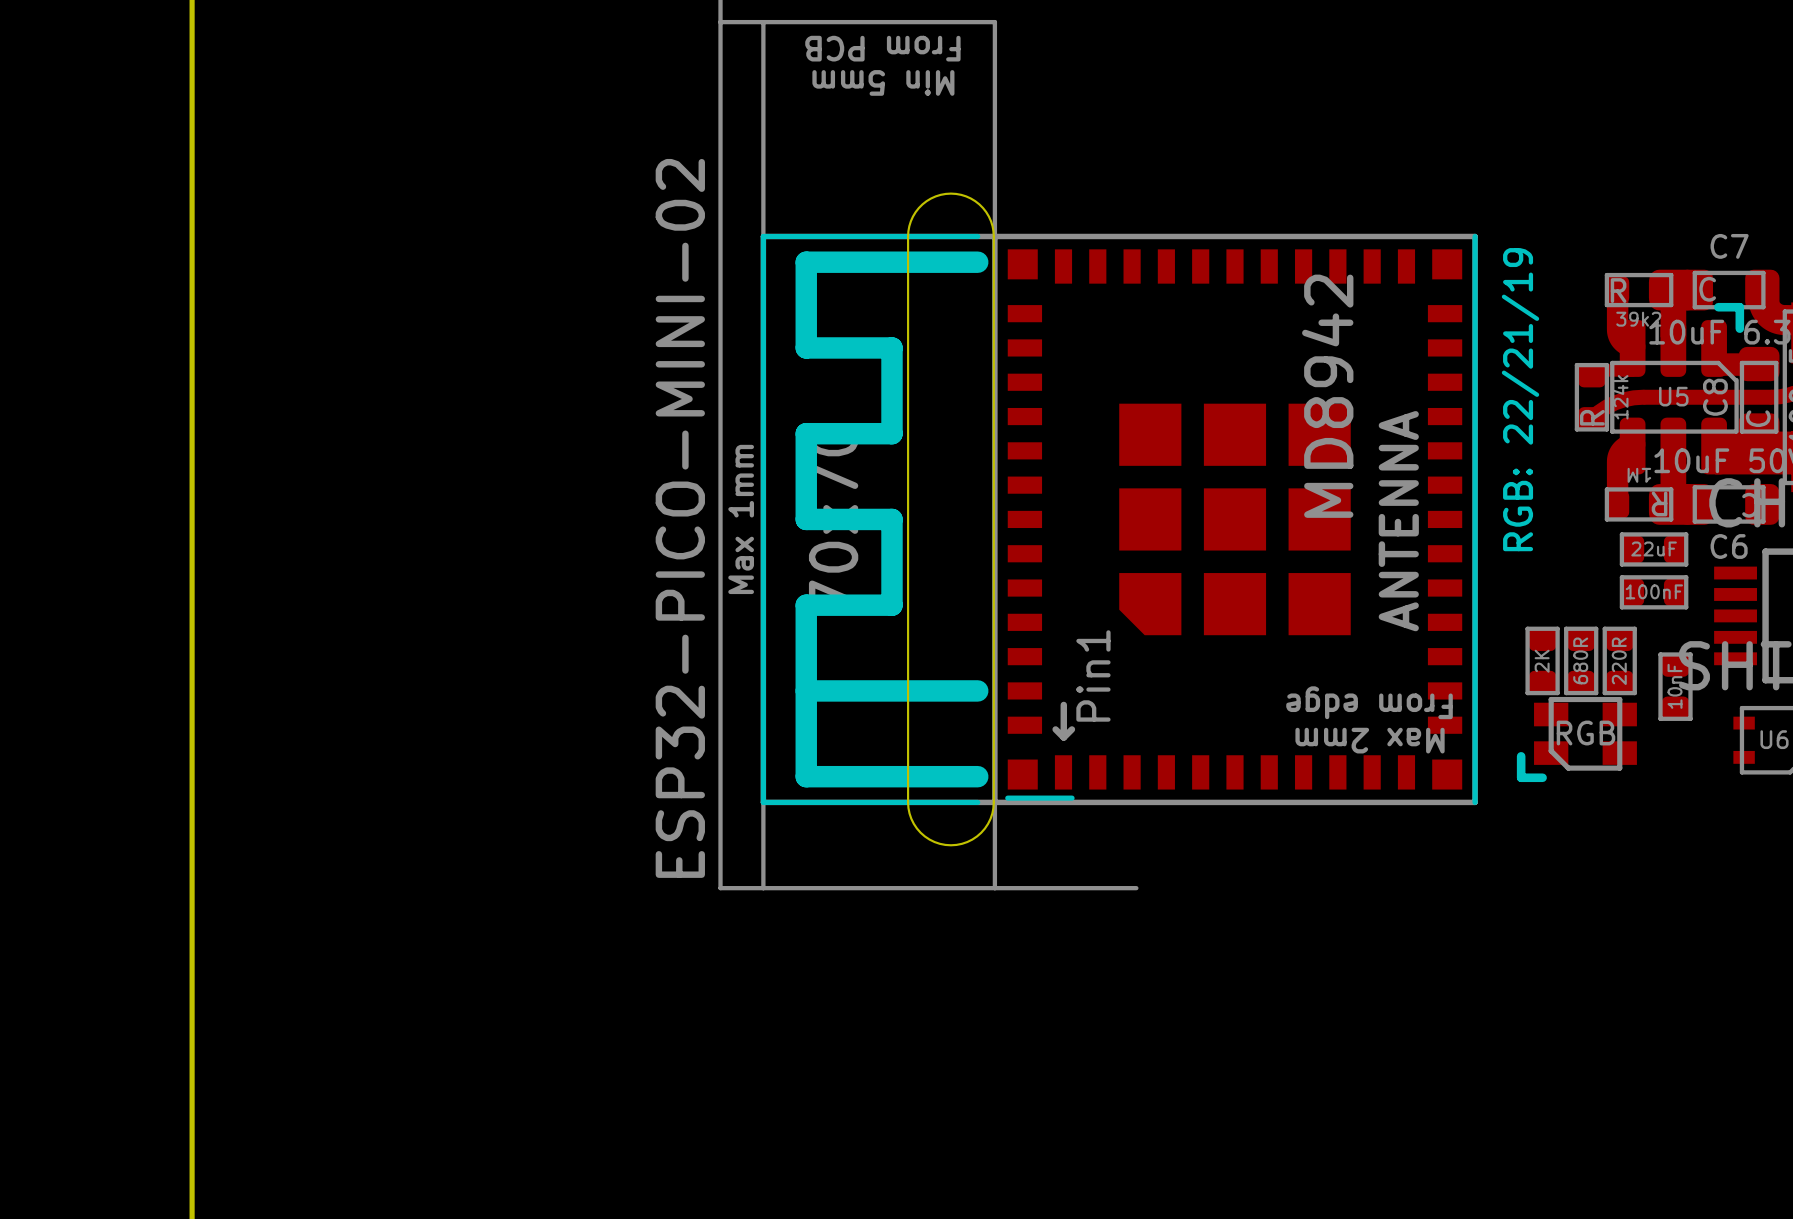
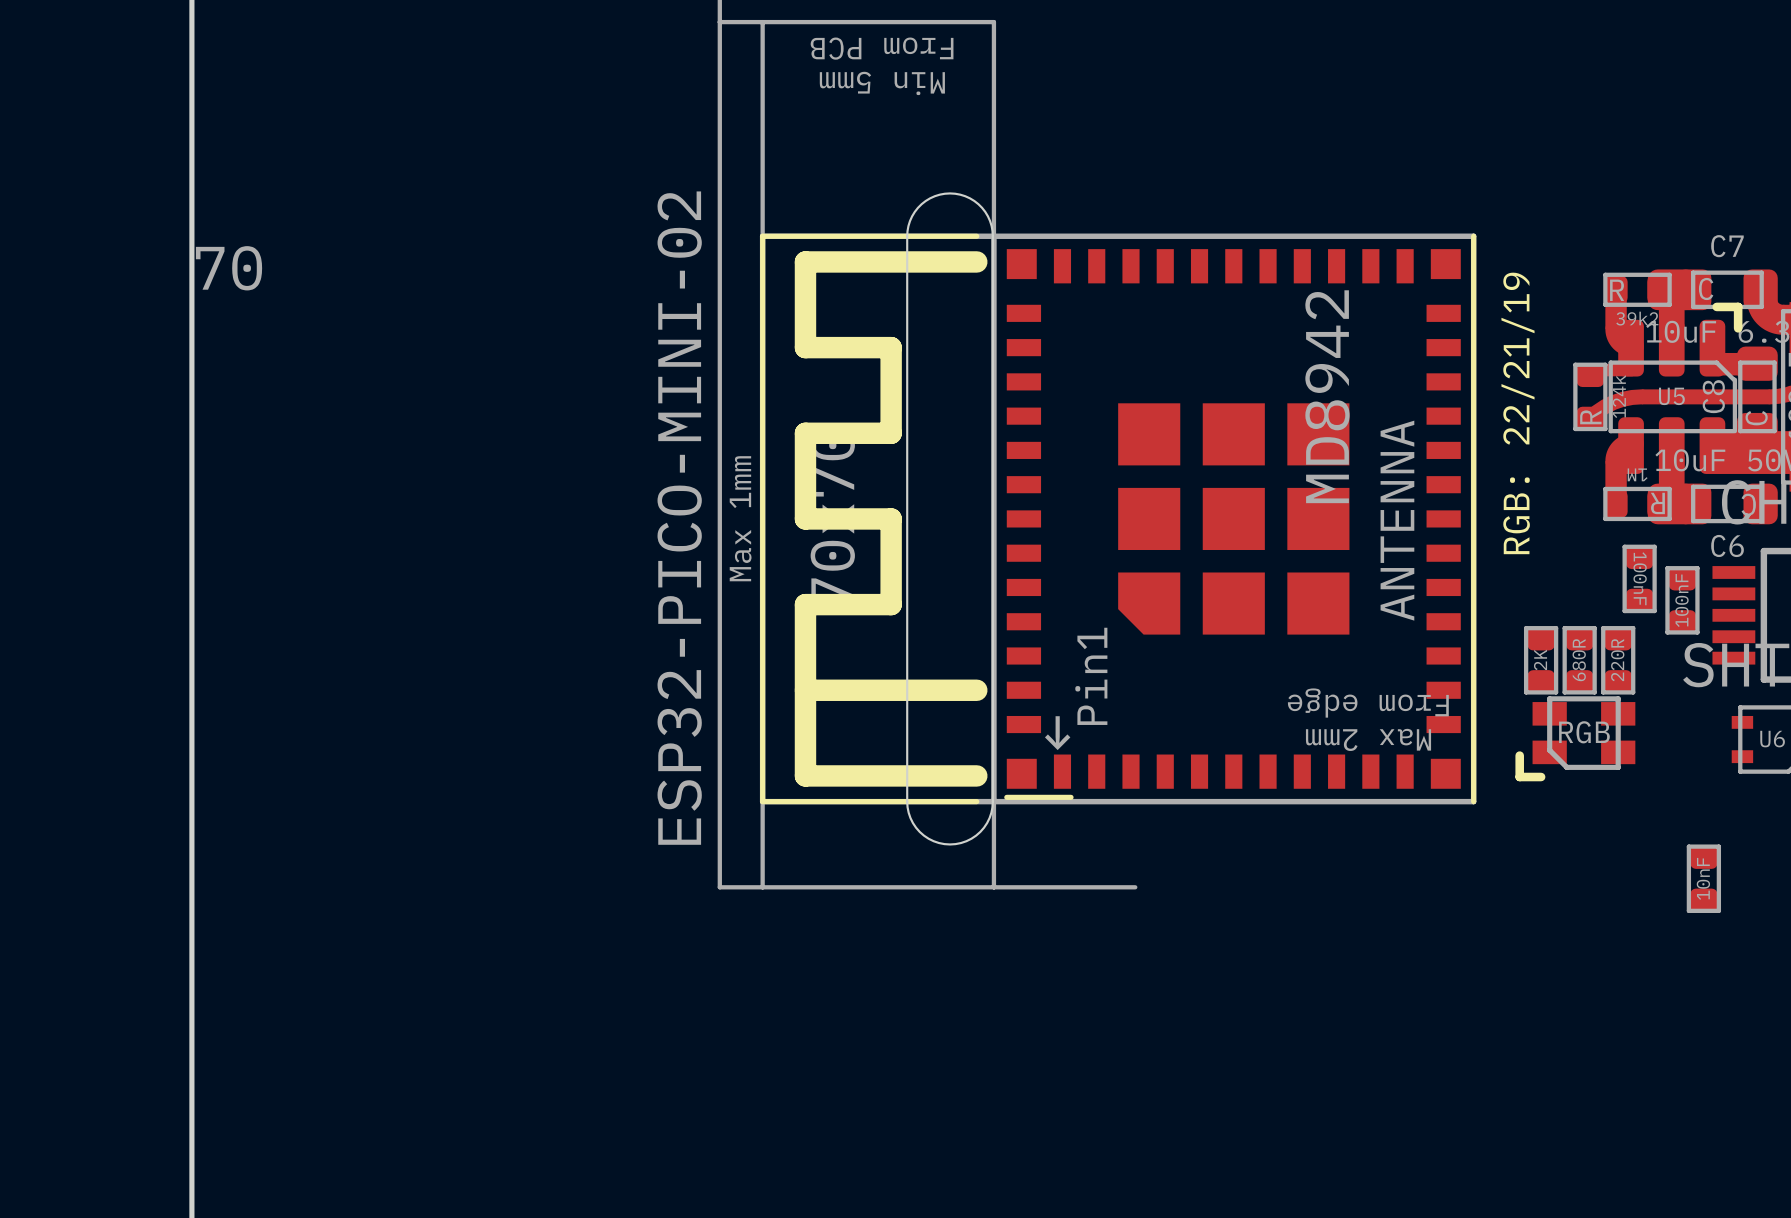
drawing: none -> [195, 246, 263, 291]
part: 22uF (1654, 549) -> none
part: none -> 100nF (1639, 578)
part: 100nF (1654, 592) -> none
part: none -> 100nF (1682, 600)
part position: (1675, 686) -> (1703, 878)

